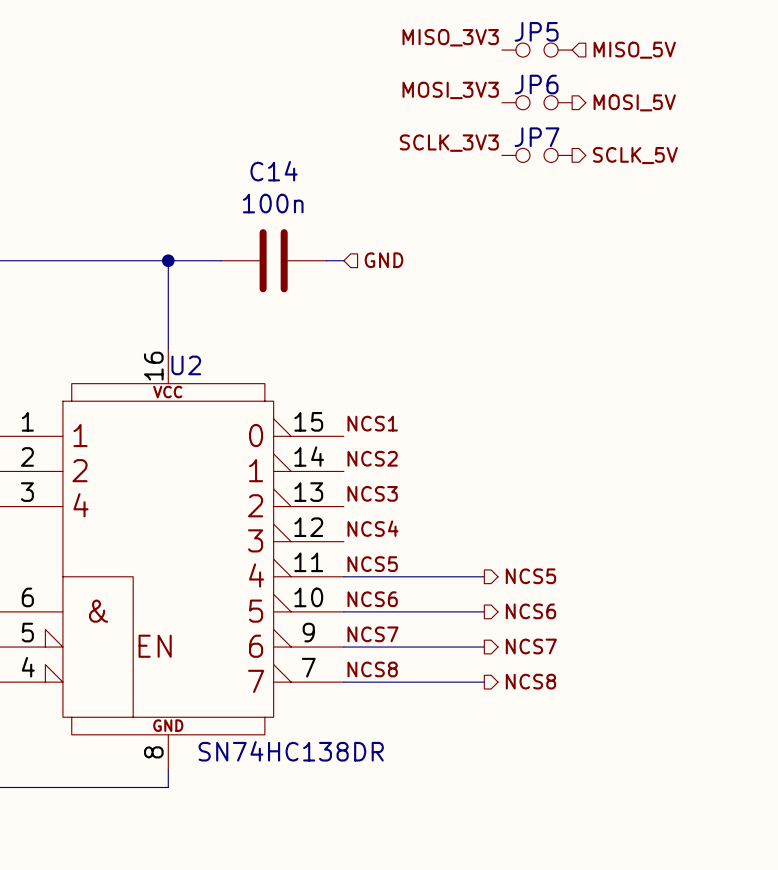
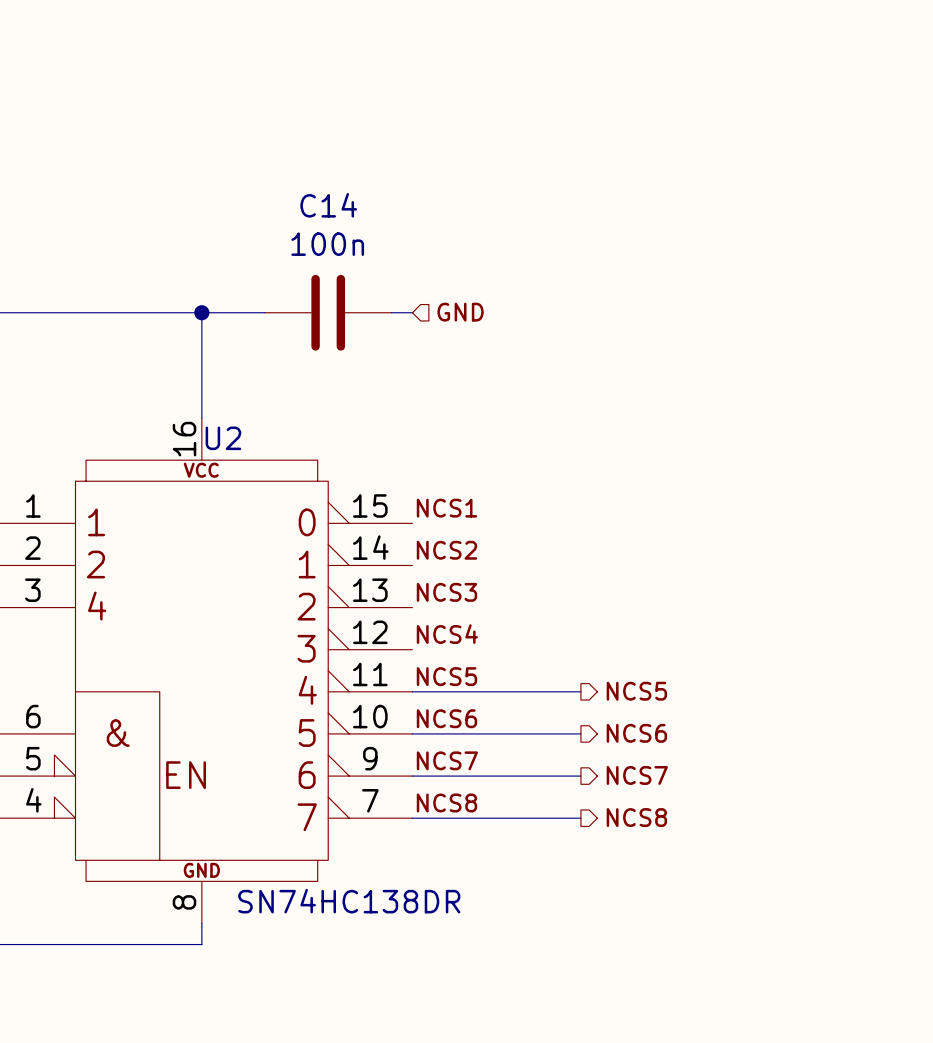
label: MISO_3V3 (450, 37) -> none
JP5: (537, 50) -> none
hierarchical label: MISO_5V (634, 50) -> none
label: MOSI_3V3 (450, 90) -> none
JP6: (537, 102) -> none
hierarchical label: MOSI_5V (634, 102) -> none
label: SCLK_3V3 (449, 143) -> none
JP7: (537, 155) -> none
hierarchical label: SCLK_5V (635, 155) -> none

